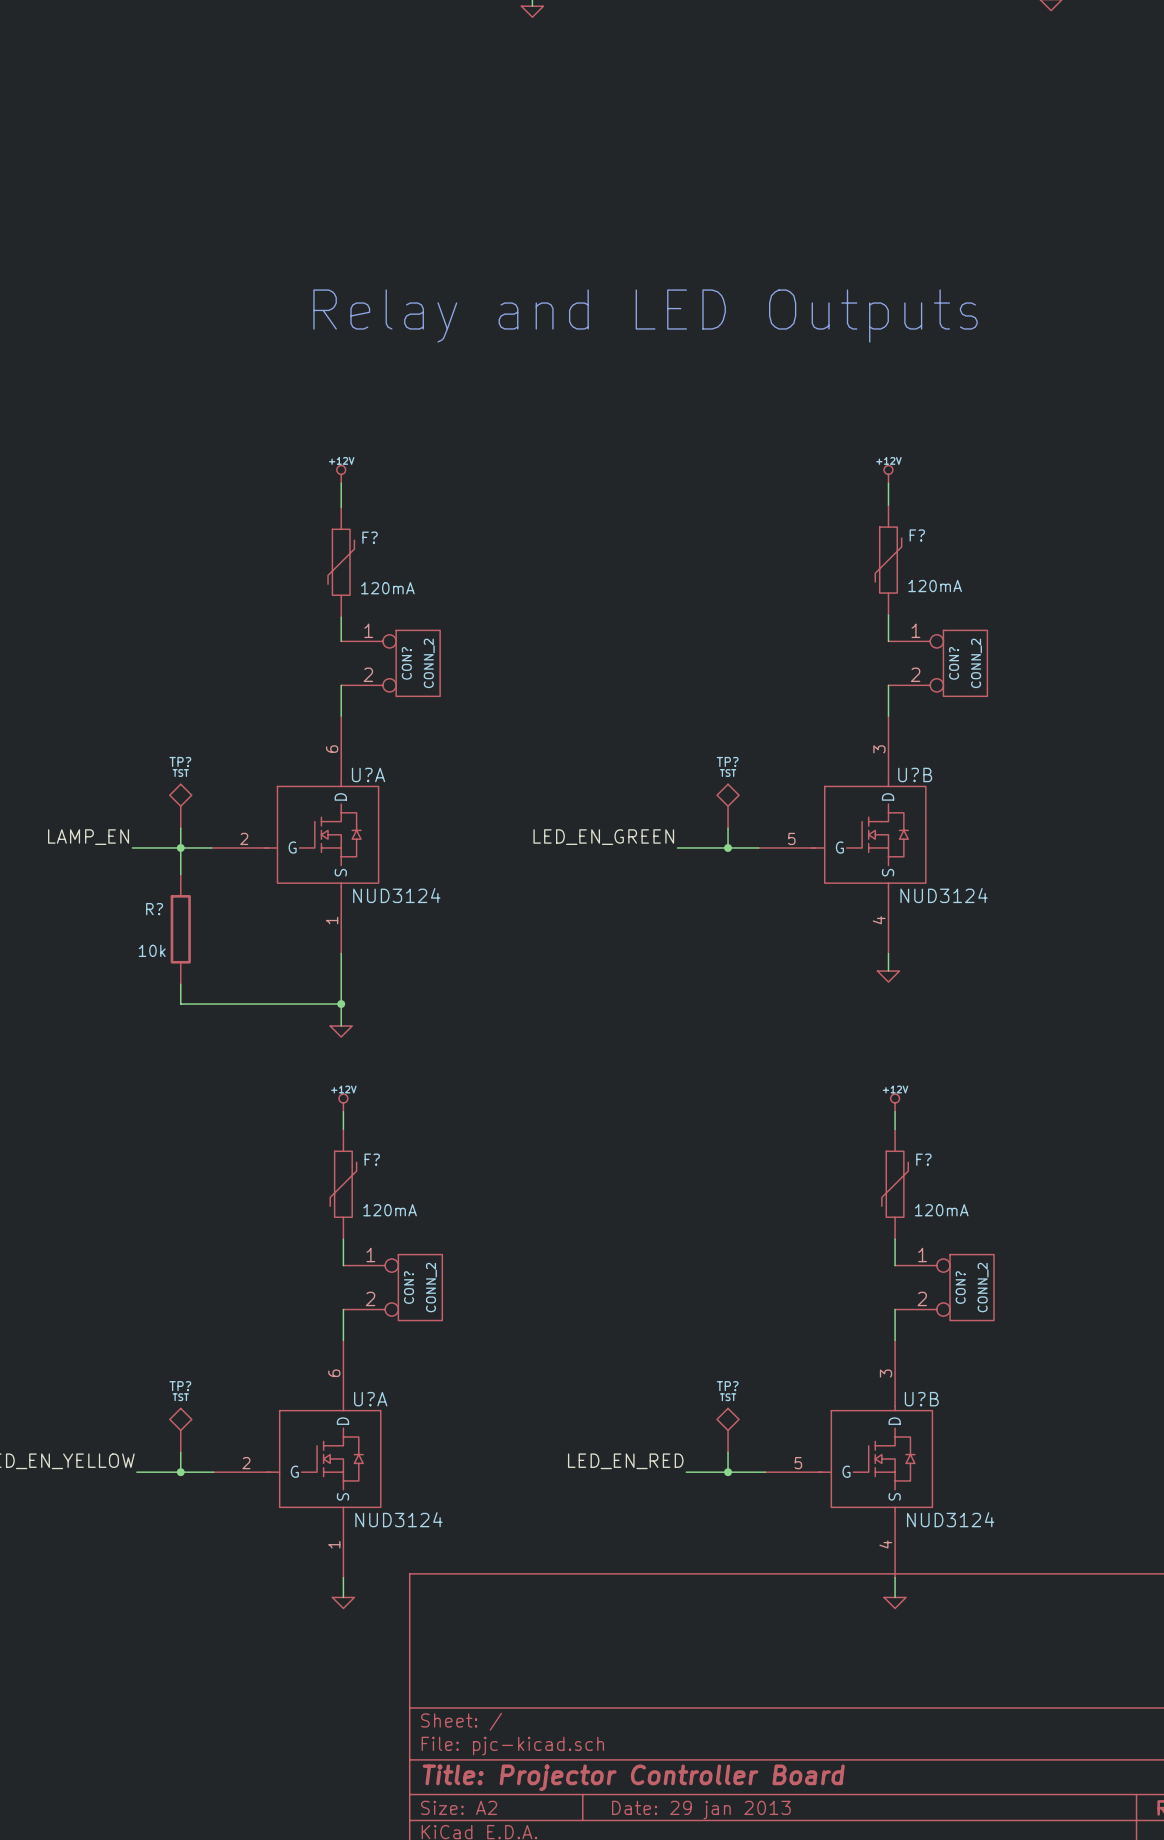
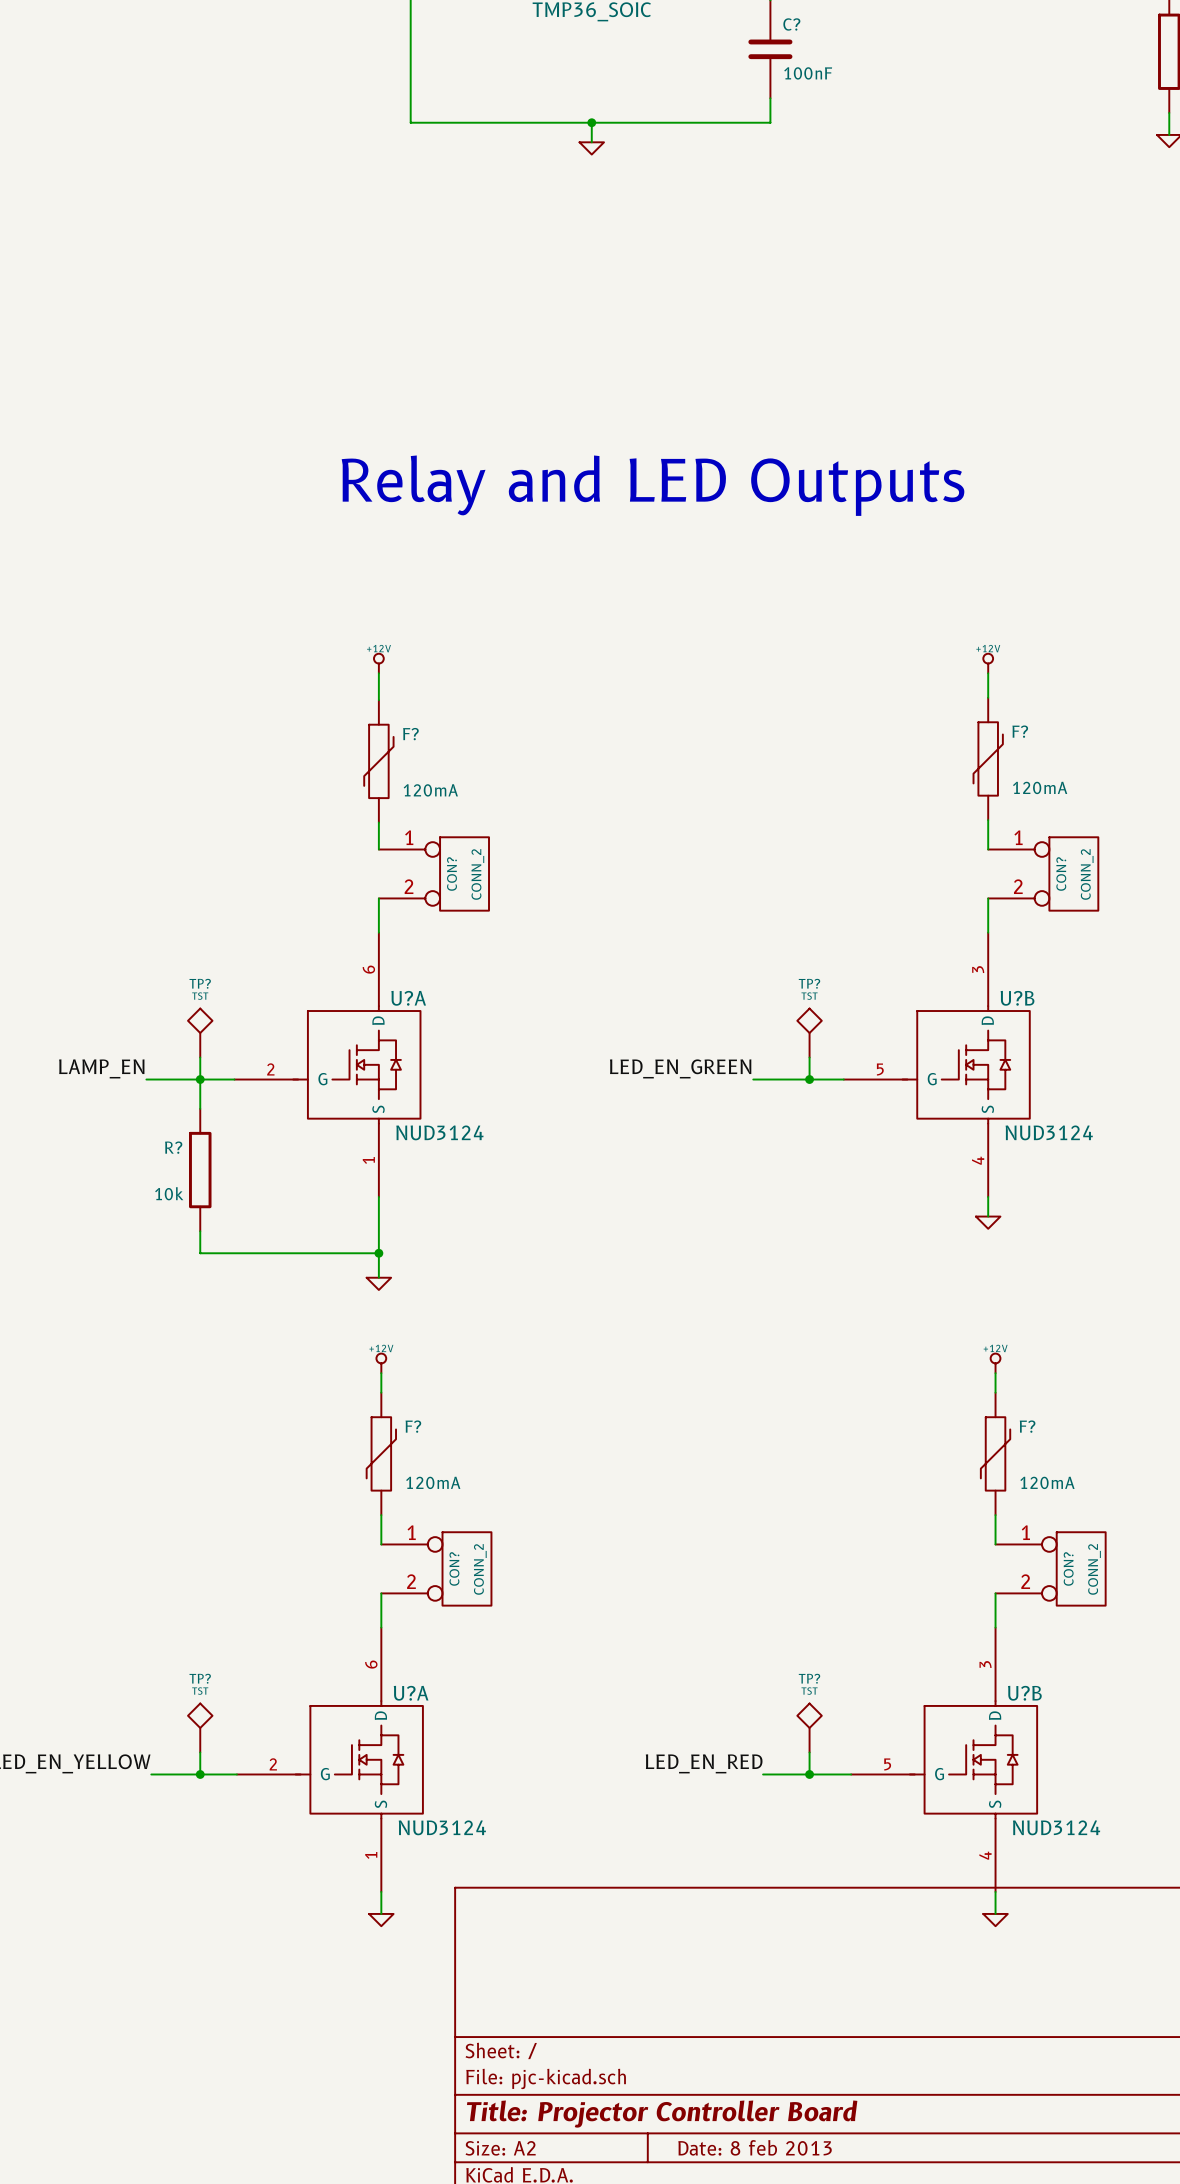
title block: Date: 29 jan 2013 (701, 1810) -> Date: 8 feb 2013 (755, 2147)

